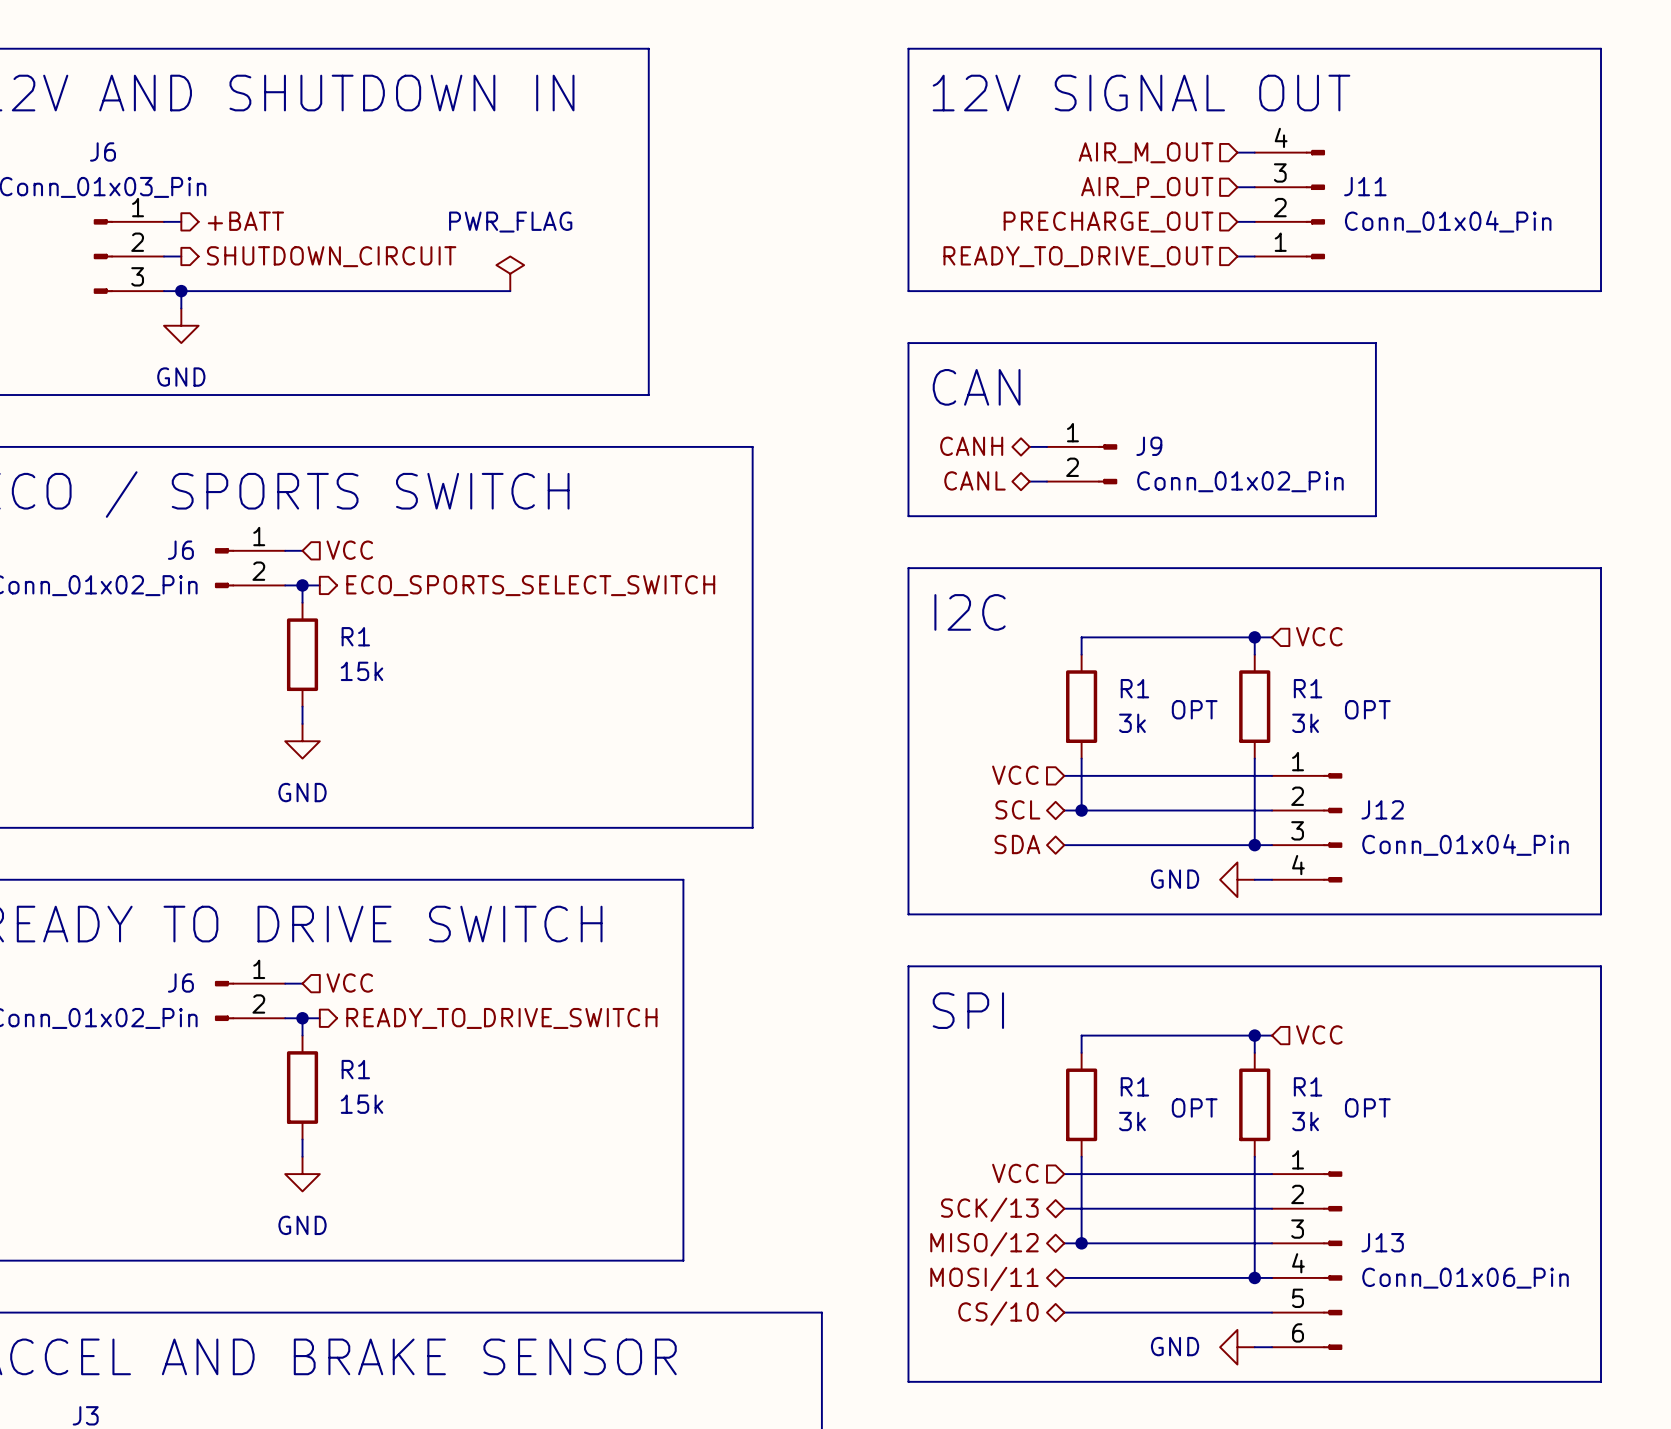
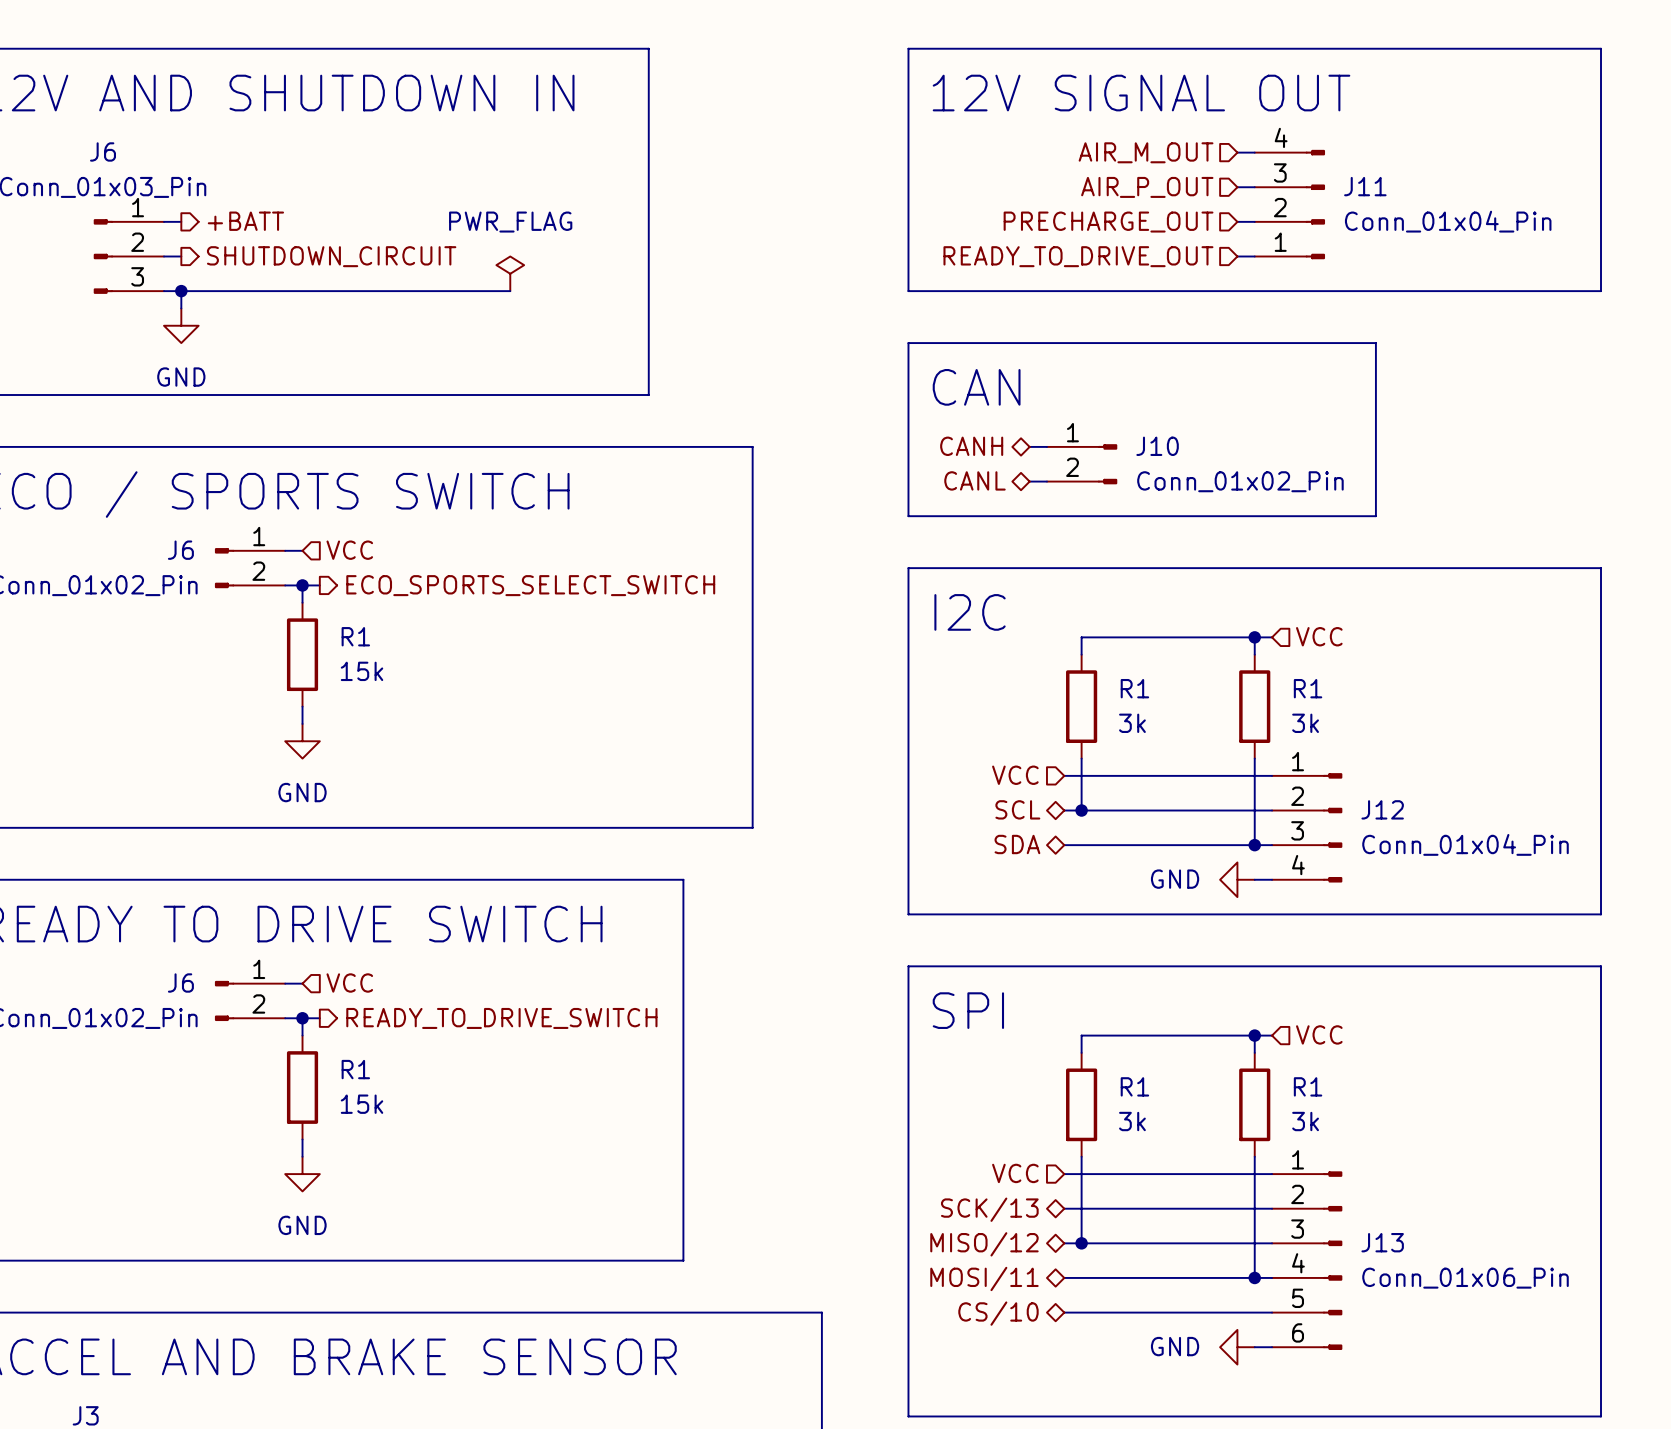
J9 name: J9 (1149, 446) -> J10 (1157, 446)
text: OPT (1194, 709) -> none
text: OPT (1367, 709) -> none
text: OPT (1194, 1107) -> none
text: OPT (1367, 1107) -> none
line: (908, 1381) (1601, 1381) -> (908, 1381) (908, 1416) (1601, 1416) (1601, 1381)

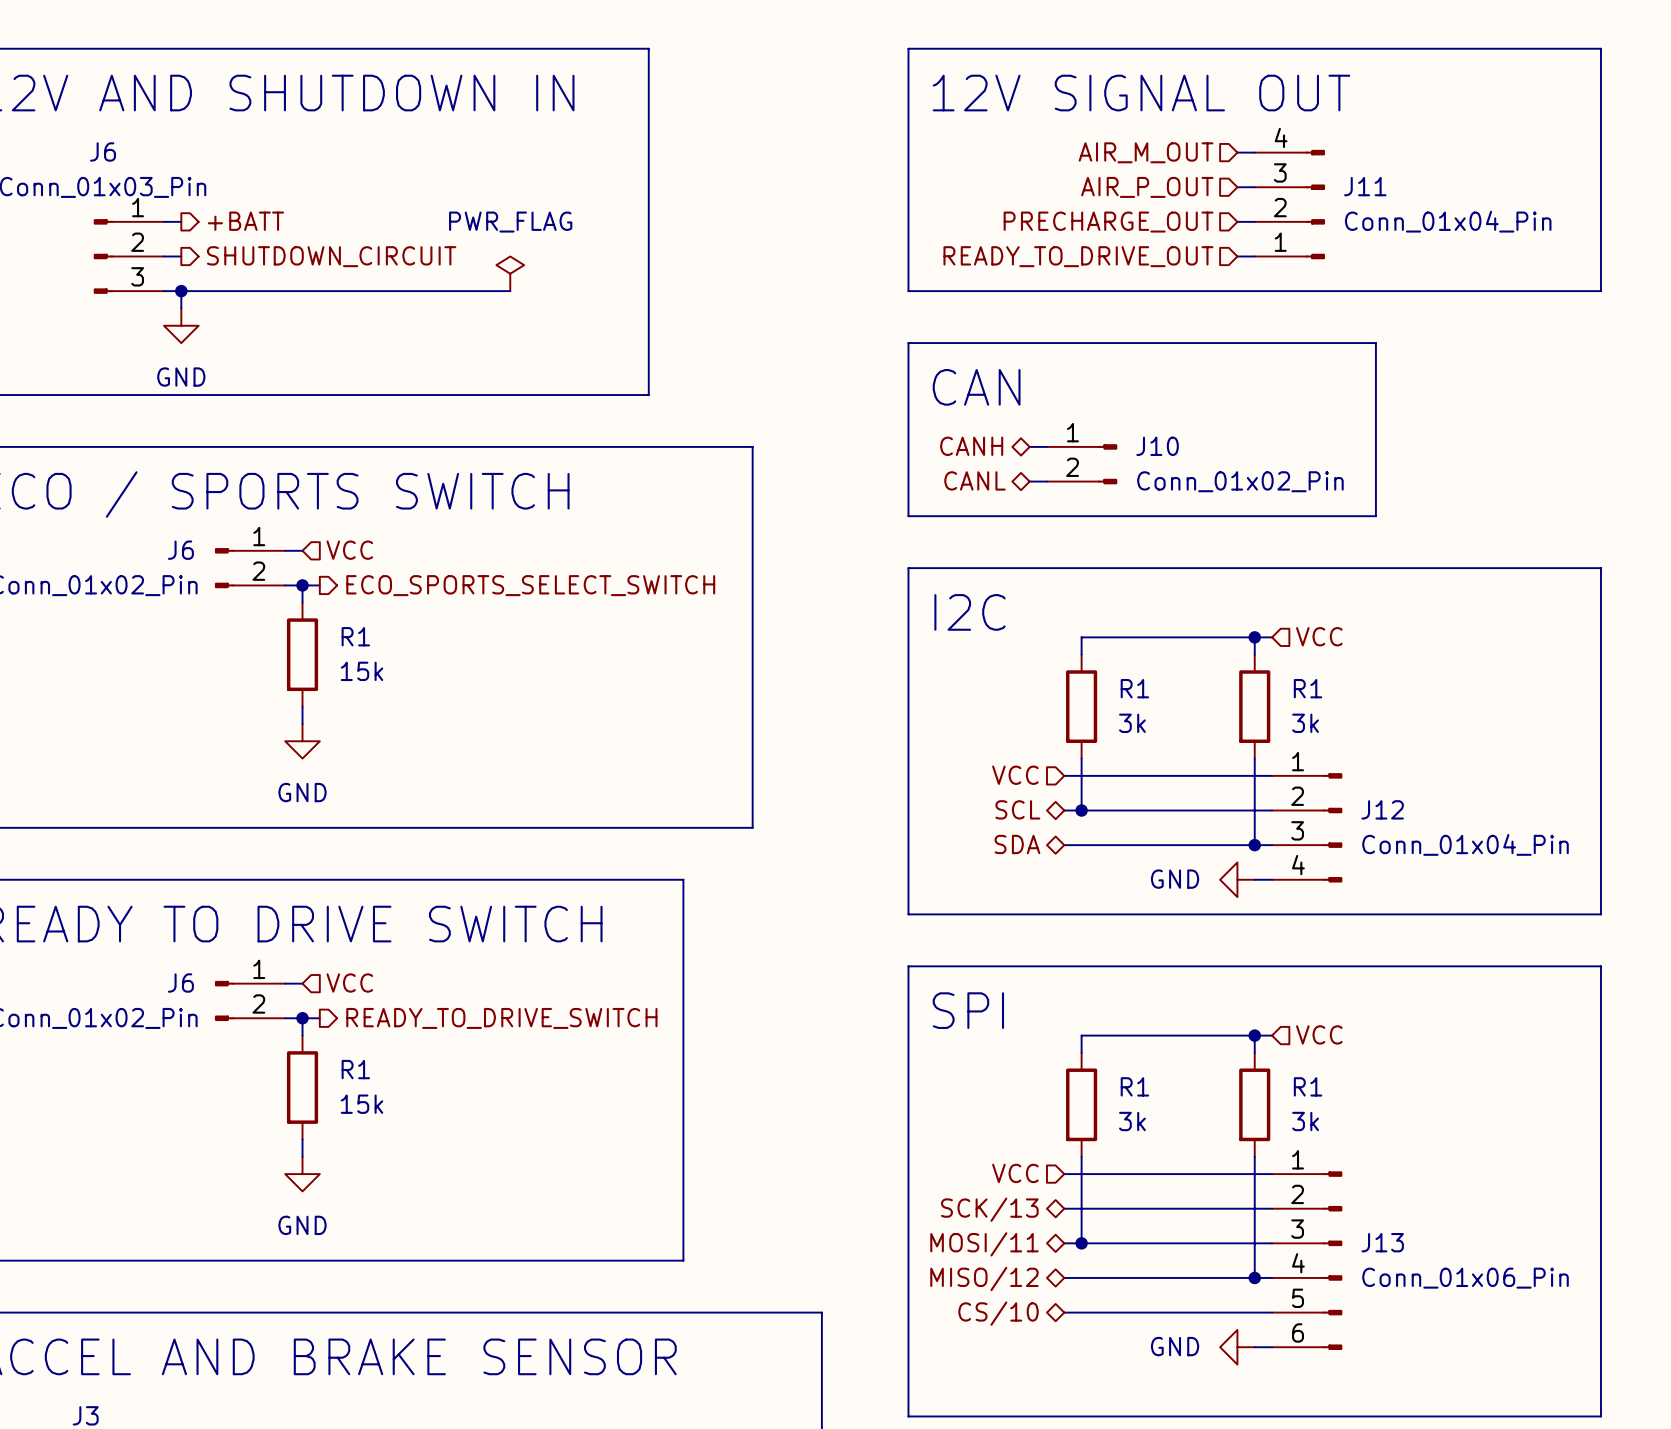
hierarchical label: MISO/12 (984, 1244) -> MOSI/11 (984, 1244)
hierarchical label: MOSI/11 (984, 1278) -> MISO/12 (984, 1278)

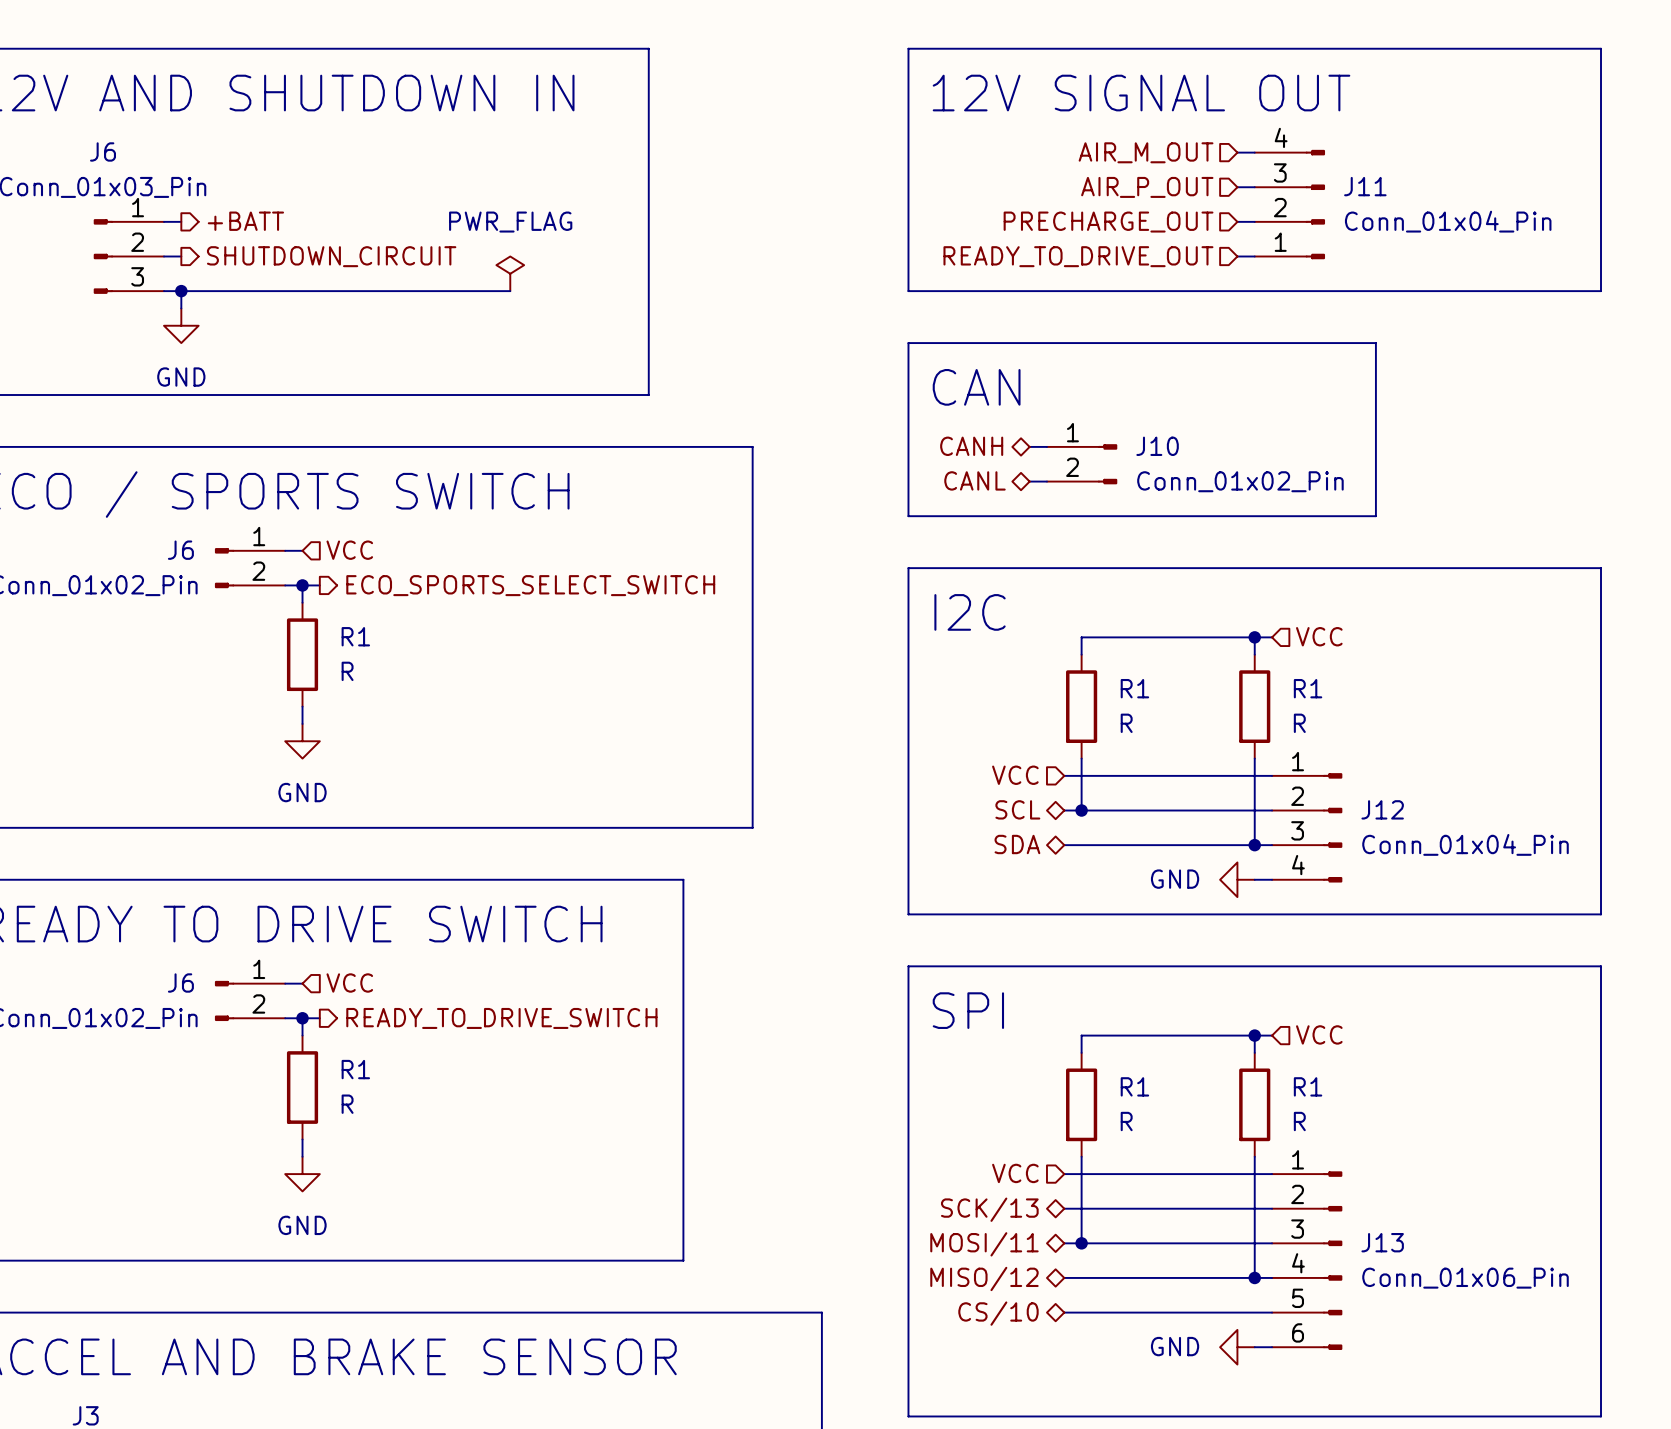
R1 value: 15k (362, 671) -> R (347, 671)
R1 value: 3k (1132, 723) -> R (1126, 723)
R1 value: 3k (1305, 723) -> R (1299, 723)
R1 value: 15k (362, 1104) -> R (347, 1104)
R1 value: 3k (1132, 1121) -> R (1126, 1121)
R1 value: 3k (1305, 1121) -> R (1299, 1121)

